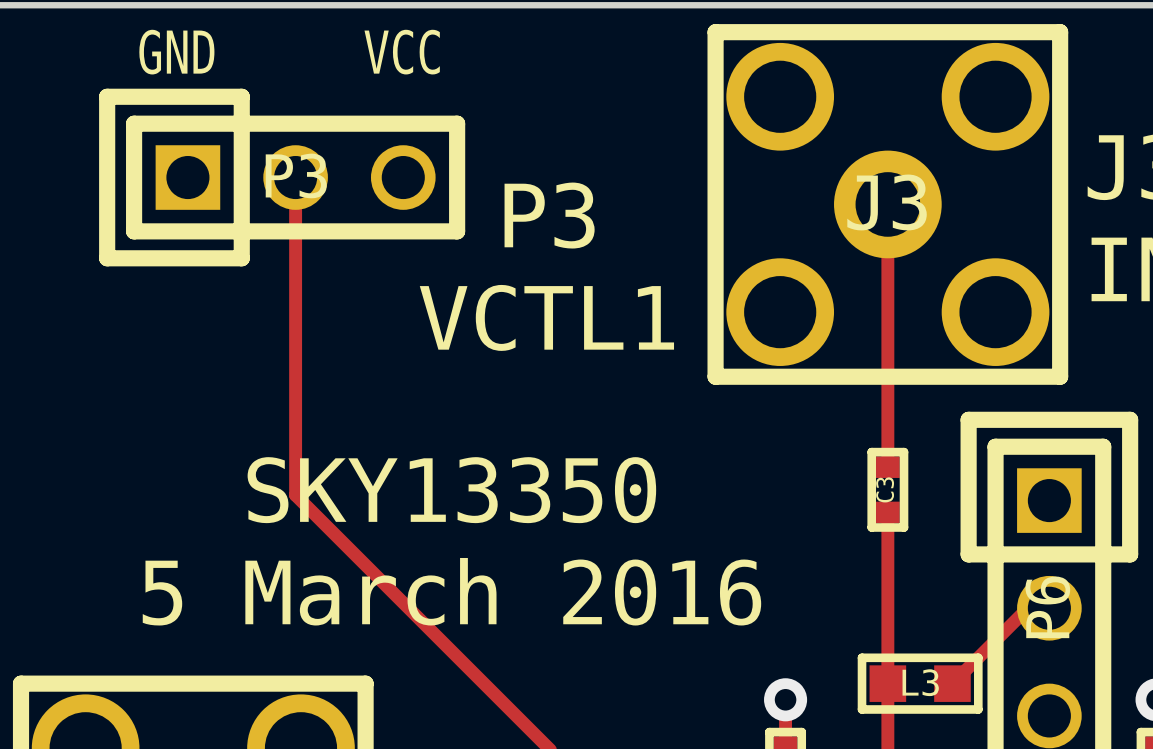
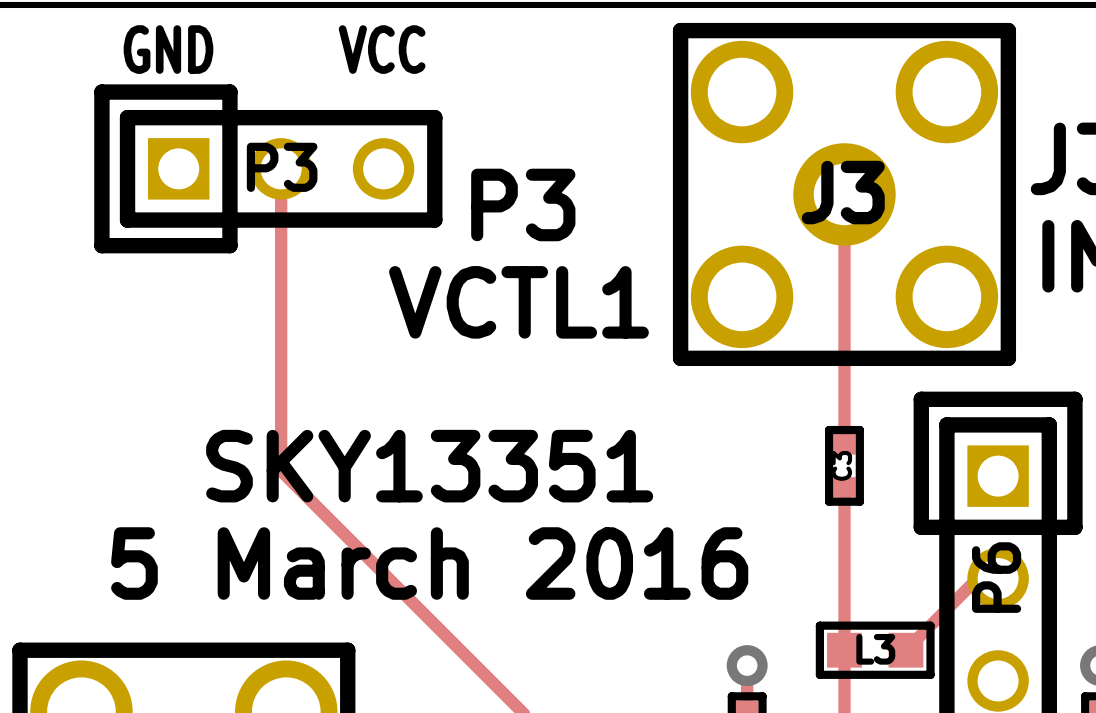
text: SKY13350 (451, 490) -> SKY13351 (429, 466)

